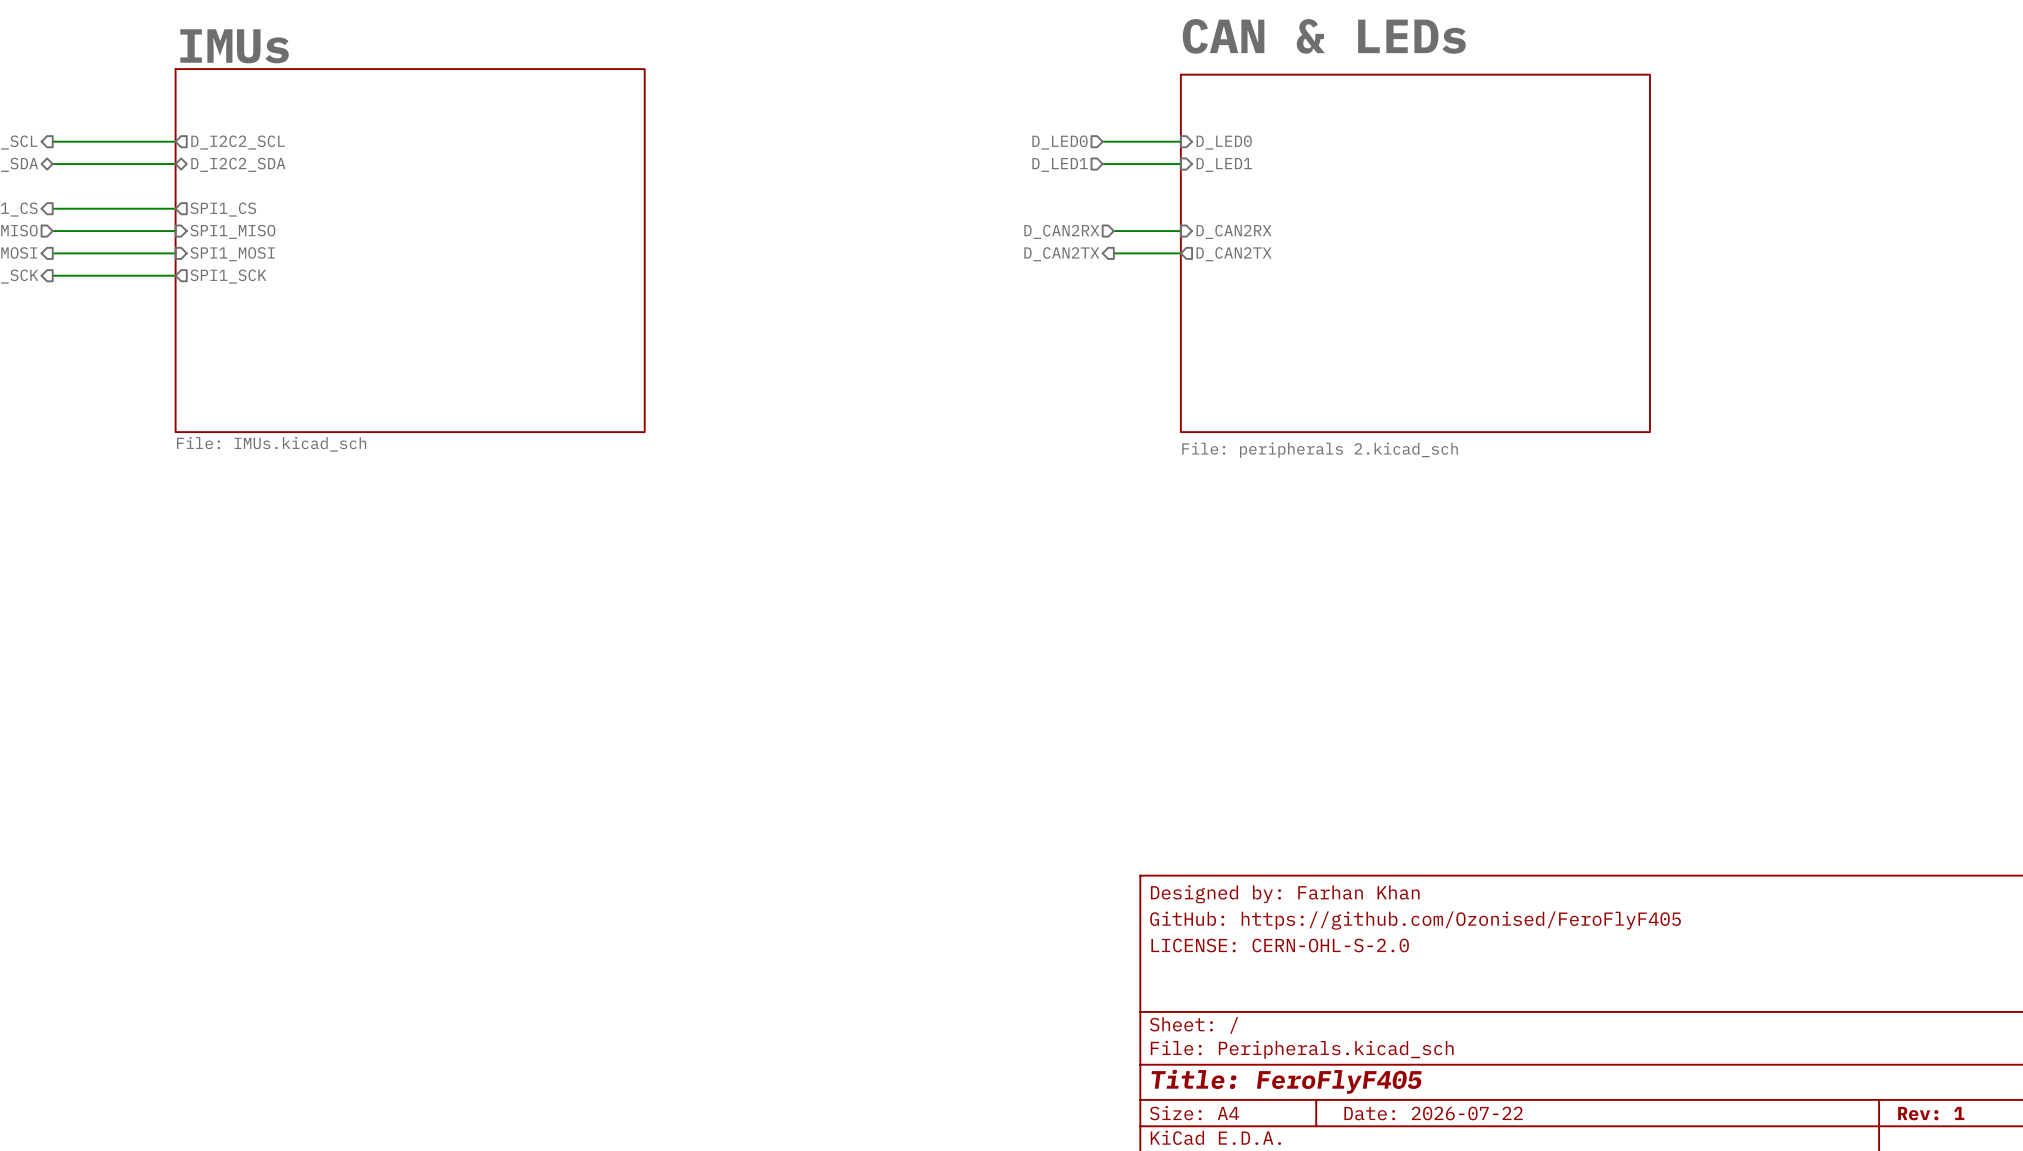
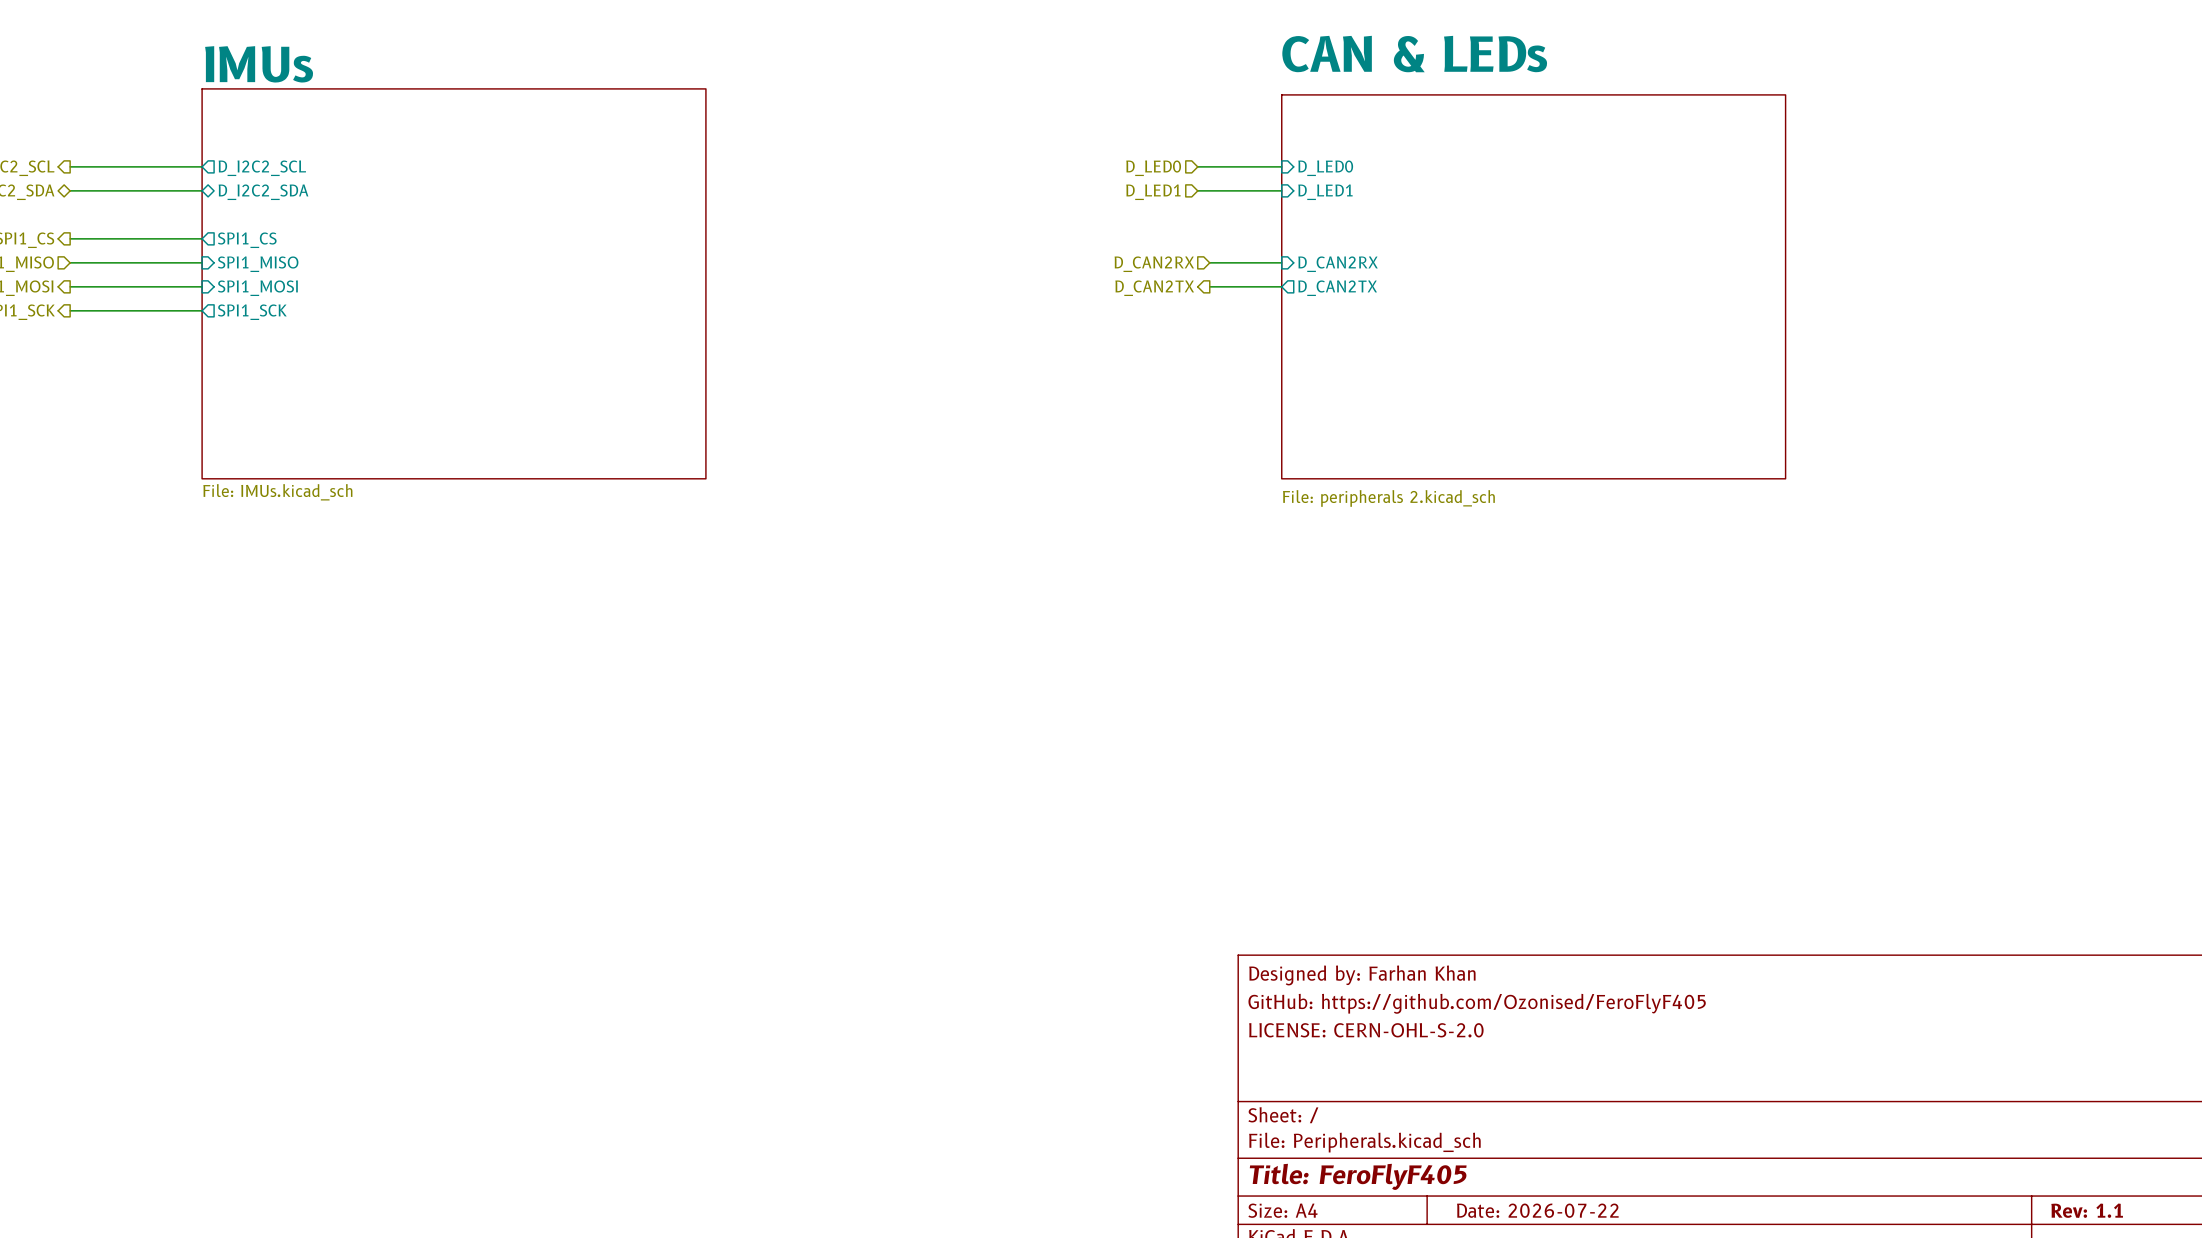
title block: Rev: 1 (1931, 1113) -> Rev: 1.1 (2087, 1210)

